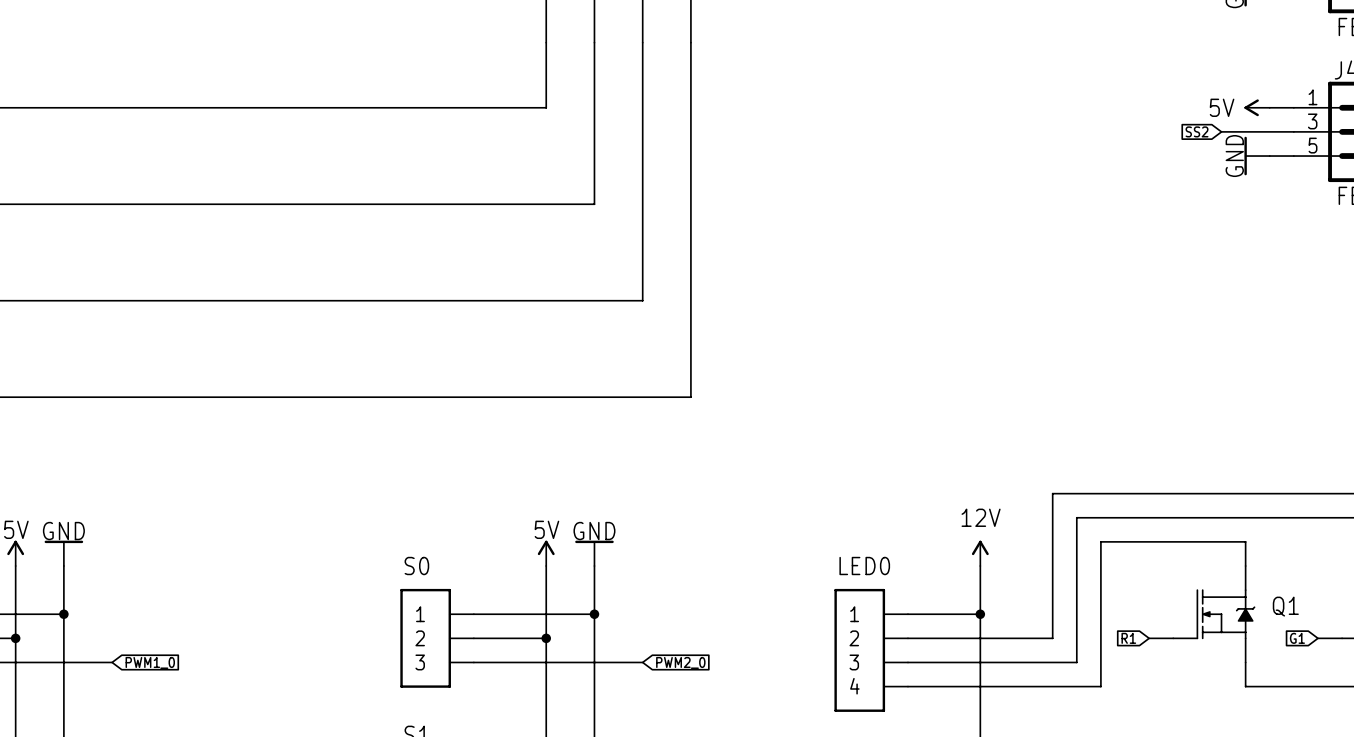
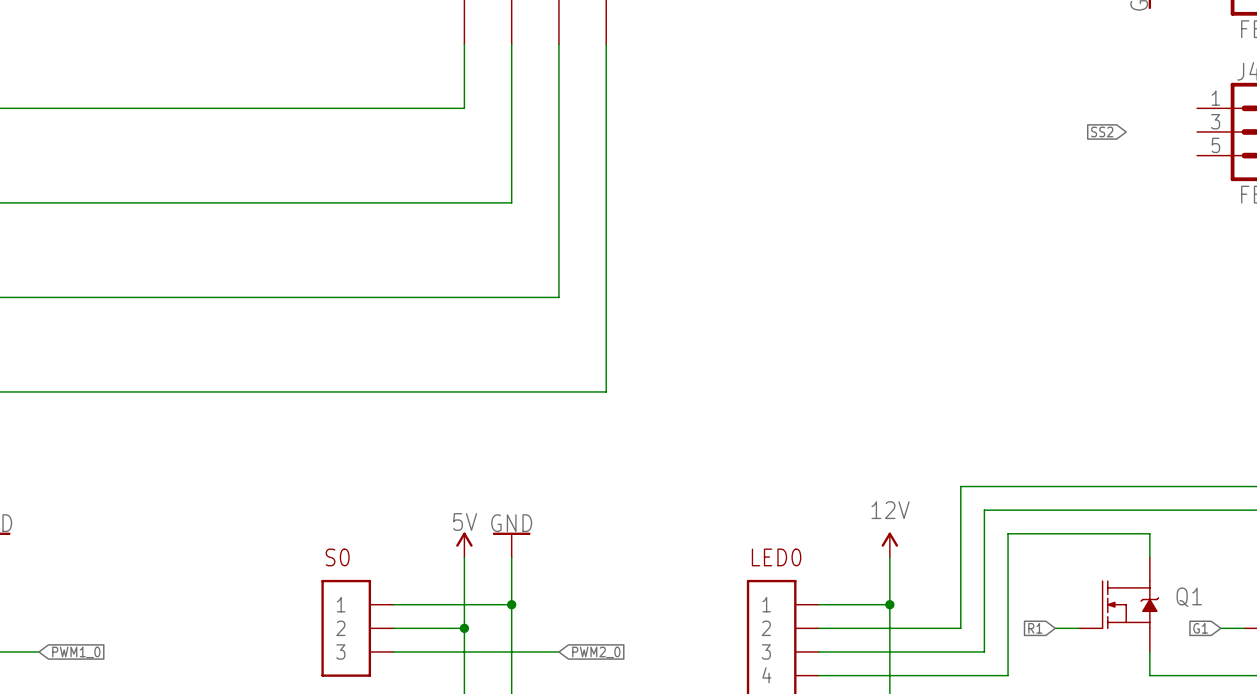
power symbol: 5V (1257, 107) -> none
wire: (1269, 107) (1293, 107) -> none
wire: (1221, 131) (1293, 131) -> none
power symbol: GND (1257, 156) -> none
wire: (1269, 156) (1293, 156) -> none

